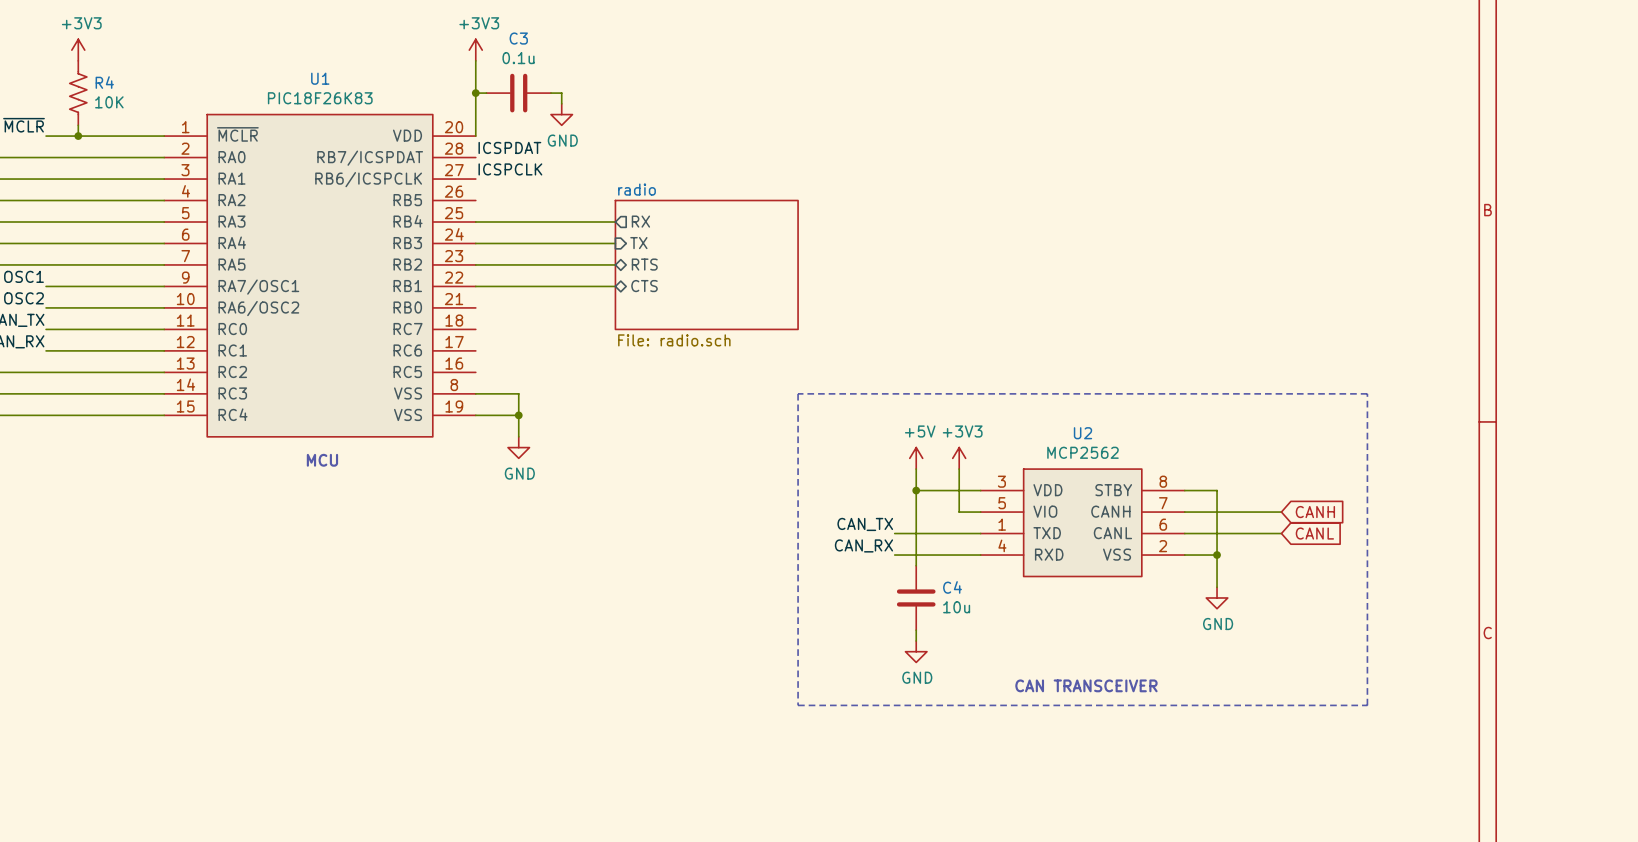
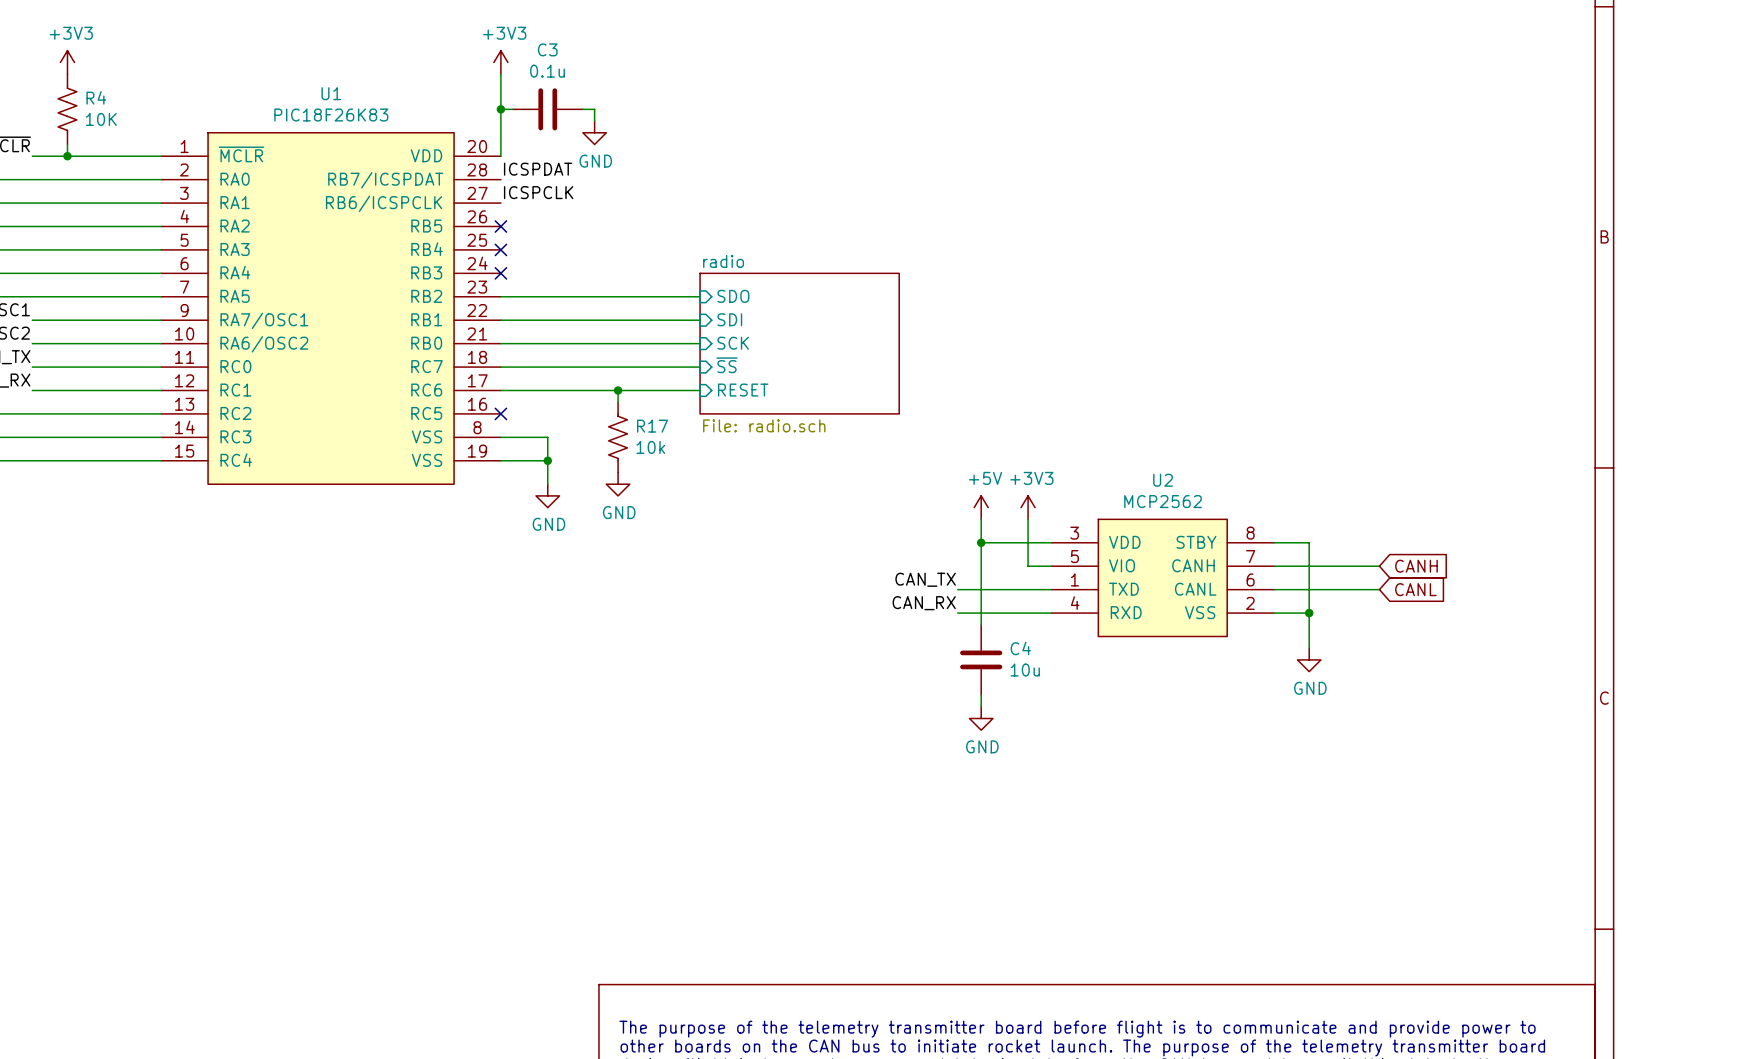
no-connect mark: none -> (500, 226)
wire: (475, 221) (615, 221) -> none
no-connect mark: none -> (500, 249)
sheet pin: RX (640, 221) -> none
wire: (475, 243) (615, 243) -> none
no-connect mark: none -> (500, 273)
sheet pin: TX (638, 243) -> none
wire: none -> (653, 296) (700, 296)
sheet pin: RTS (644, 264) -> none
sheet pin: none -> SDO (733, 296)
sheet radio position: (706, 264) -> (799, 343)
wire: none -> (653, 320) (700, 320)
sheet pin: CTS (644, 286) -> none
sheet pin: none -> SDI (729, 319)
wire: none -> (500, 343) (700, 343)
sheet pin: none -> SCK (733, 343)
sheet pin: none -> ~{SS} (727, 365)
wire: none -> (500, 367) (700, 367)
wire: none -> (500, 390) (700, 390)
wire: none -> (618, 390) (618, 402)
junction: none -> (618, 390)
sheet pin: none -> RESET (743, 390)
no-connect mark: none -> (500, 413)
R17: none -> 10k (618, 437)
line: (798, 393) (1367, 393) (1367, 705) (798, 705) (798, 393) -> none
power symbol: none -> GND (618, 484)
text: MCU (322, 460) -> none
text: CAN TRANSCEIVER (1086, 685) -> none

